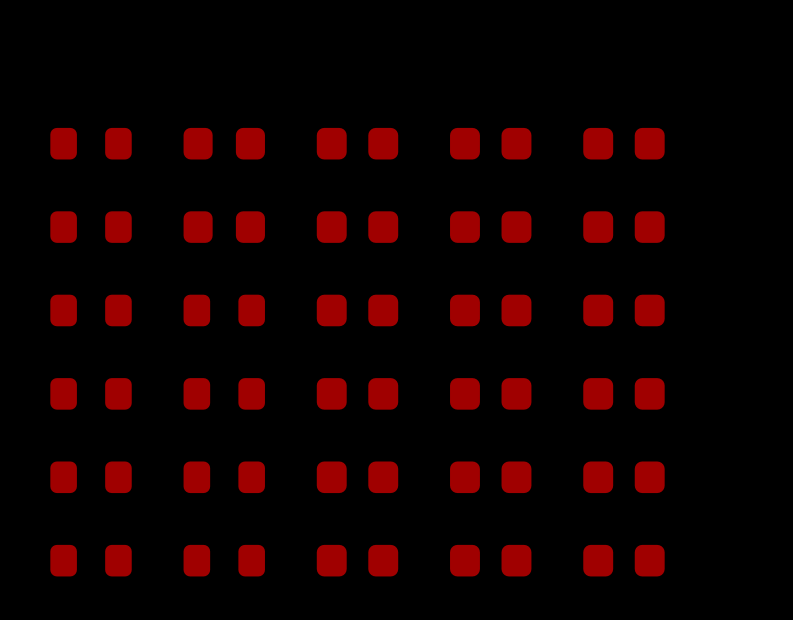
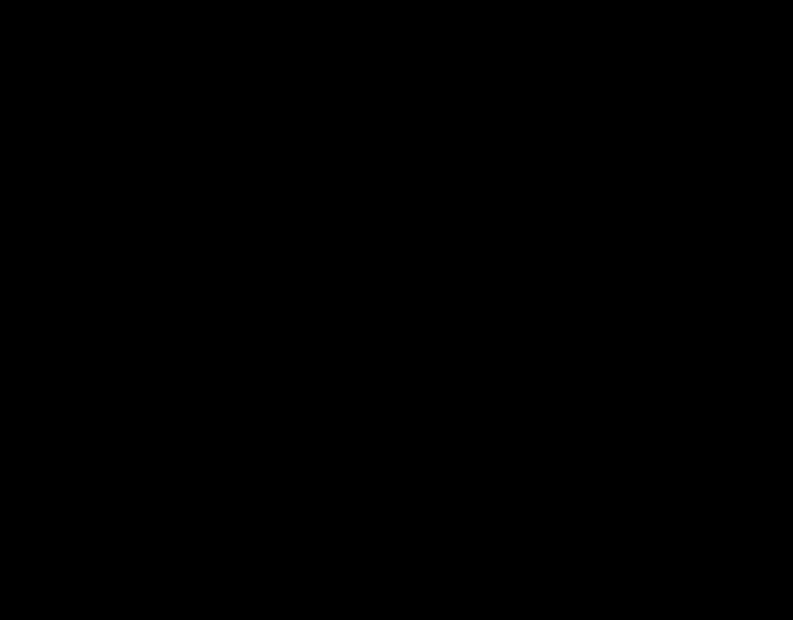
part: (91, 143) -> none
part: (224, 143) -> none
part: (357, 143) -> none
part: (490, 143) -> none
part: (623, 143) -> none
part: (91, 227) -> none
part: (224, 227) -> none
part: (357, 227) -> none
part: (490, 227) -> none
part: (623, 227) -> none
part: (91, 310) -> none
part: (224, 310) -> none
part: (357, 310) -> none
part: (490, 310) -> none
part: (623, 310) -> none
part: (91, 393) -> none
part: (224, 393) -> none
part: (357, 393) -> none
part: (490, 393) -> none
part: (623, 393) -> none
part: (91, 477) -> none
part: (224, 477) -> none
part: (357, 477) -> none
part: (490, 477) -> none
part: (623, 477) -> none
part: (91, 560) -> none
part: (224, 560) -> none
part: (357, 560) -> none
part: (490, 560) -> none
part: (623, 560) -> none

